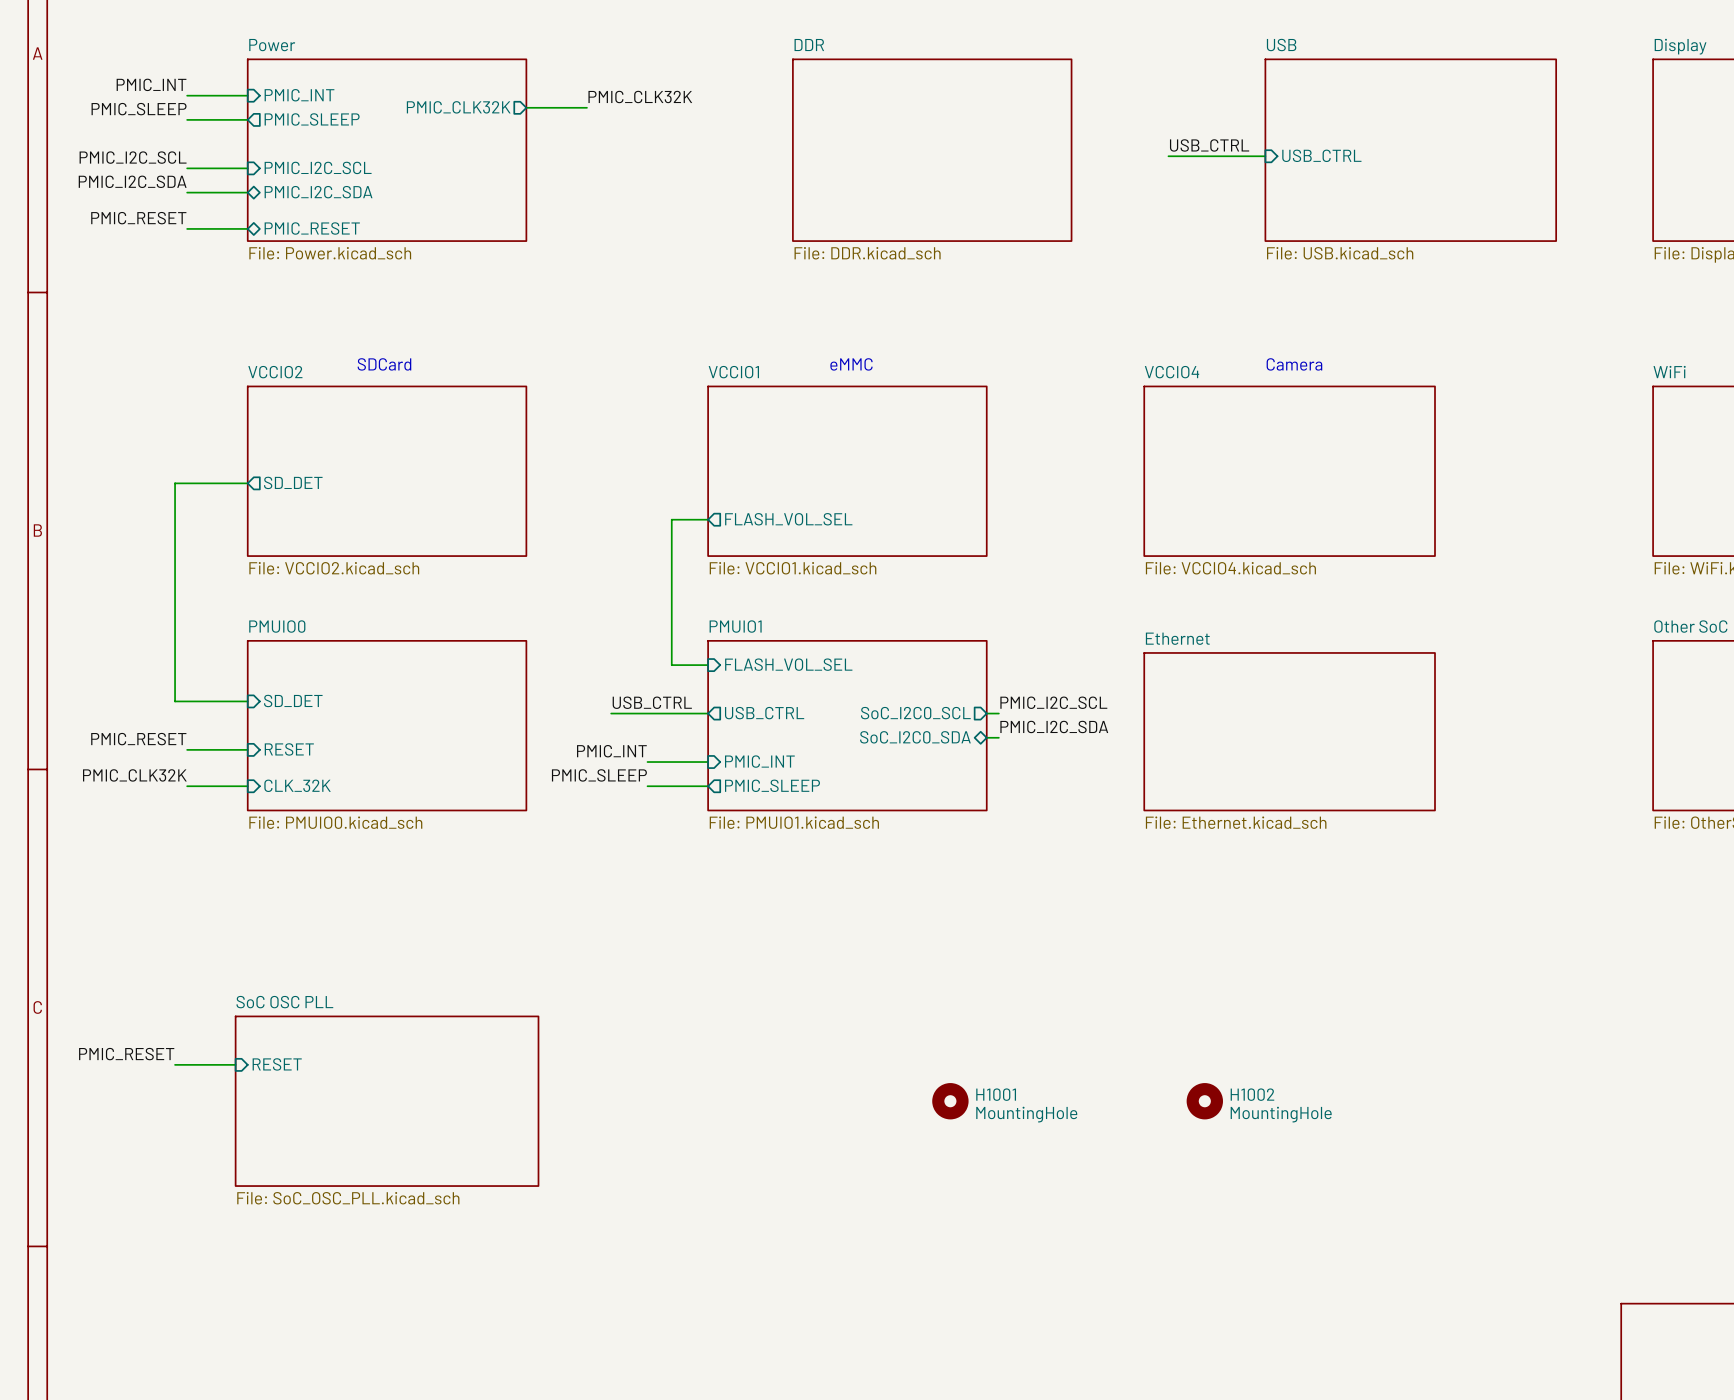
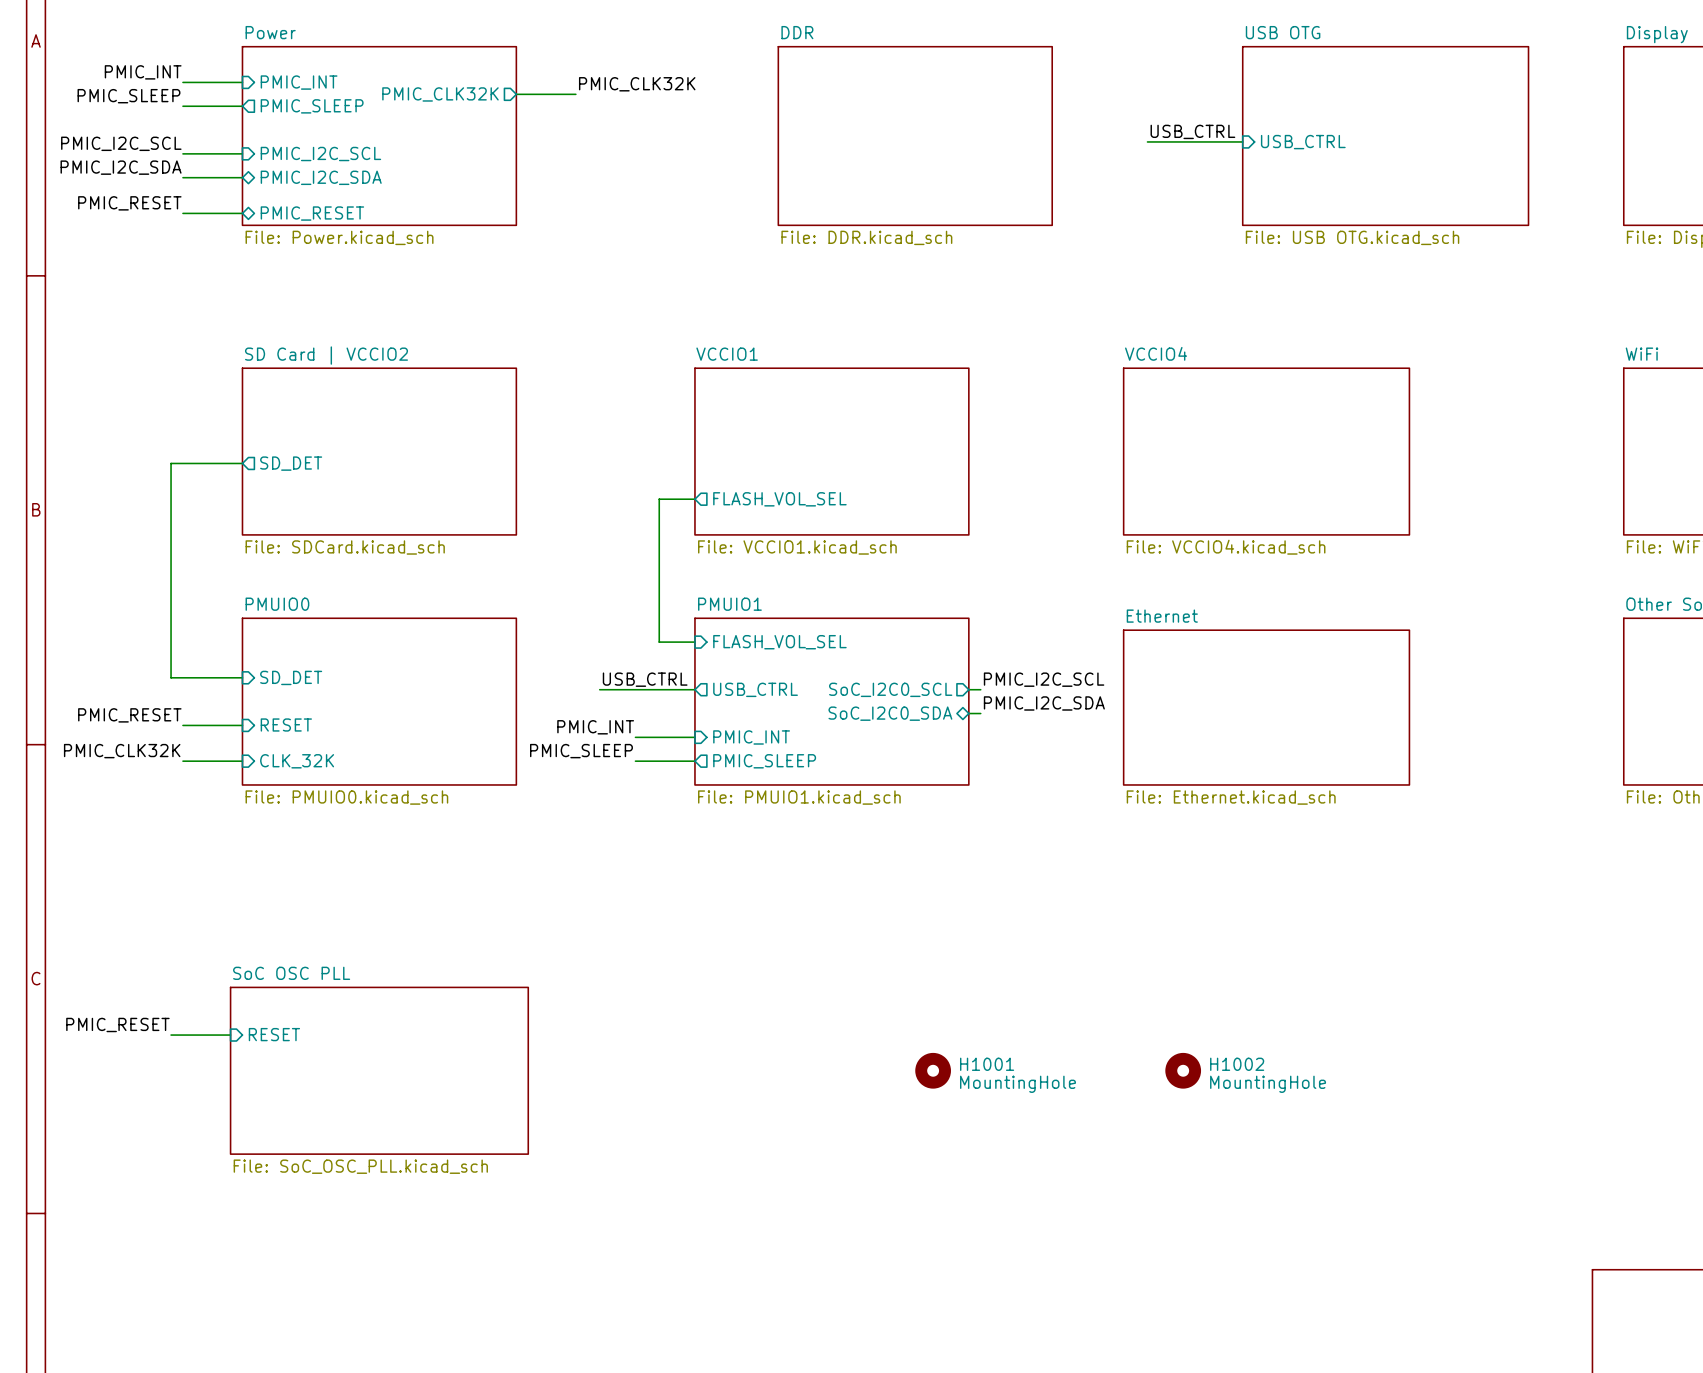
sheet USB name: USB (1281, 45) -> USB OTG (1283, 32)
sheet USB value: File: USB.kicad_sch (1340, 253) -> File: USB OTG.kicad_sch (1352, 237)
text: SDCard (384, 364) -> none
text: eMMC (851, 364) -> none
text: Camera (1294, 364) -> none
sheet VCCIO2 name: VCCIO2 (275, 372) -> SD Card | VCCIO2 (326, 355)
sheet VCCIO2 value: File: VCCIO2.kicad_sch (334, 568) -> File: SDCard.kicad_sch (345, 547)

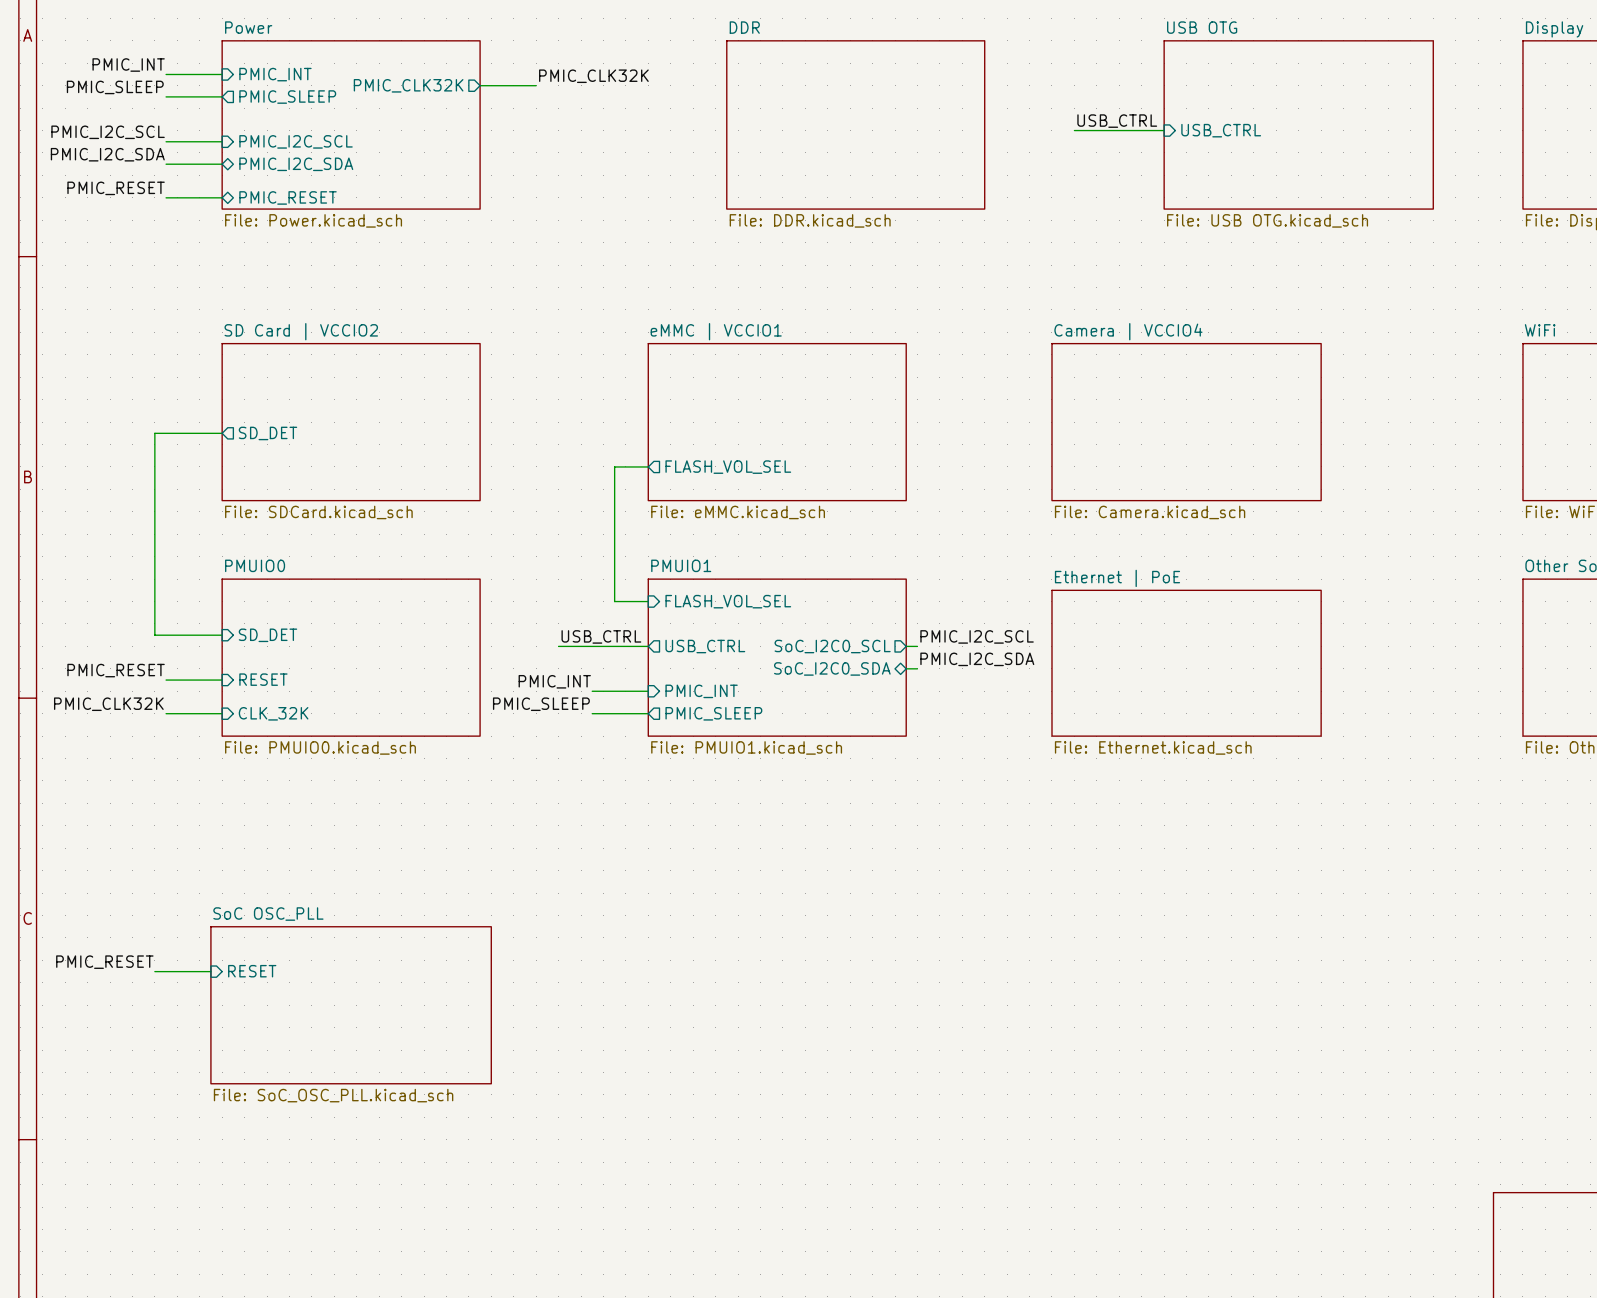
sheet VCCIO4 name: VCCIO4 (1156, 353) -> Camera | VCCIO4 (1128, 331)
sheet VCCIO1 name: VCCIO1 (727, 354) -> eMMC | VCCIO1 (716, 331)
sheet VCCIO1 value: File: VCCIO1.kicad_sch (797, 547) -> File: eMMC.kicad_sch (738, 512)
sheet VCCIO4 value: File: VCCIO4.kicad_sch (1226, 547) -> File: Camera.kicad_sch (1150, 512)
sheet Ethernet name: Ethernet (1162, 616) -> Ethernet | PoE (1117, 578)
sheet SoC OSC PLL name: SoC OSC PLL (291, 973) -> SoC OSC_PLL (268, 914)
H1001: MountingHole (933, 1070) -> none
H1002: MountingHole (1183, 1070) -> none

